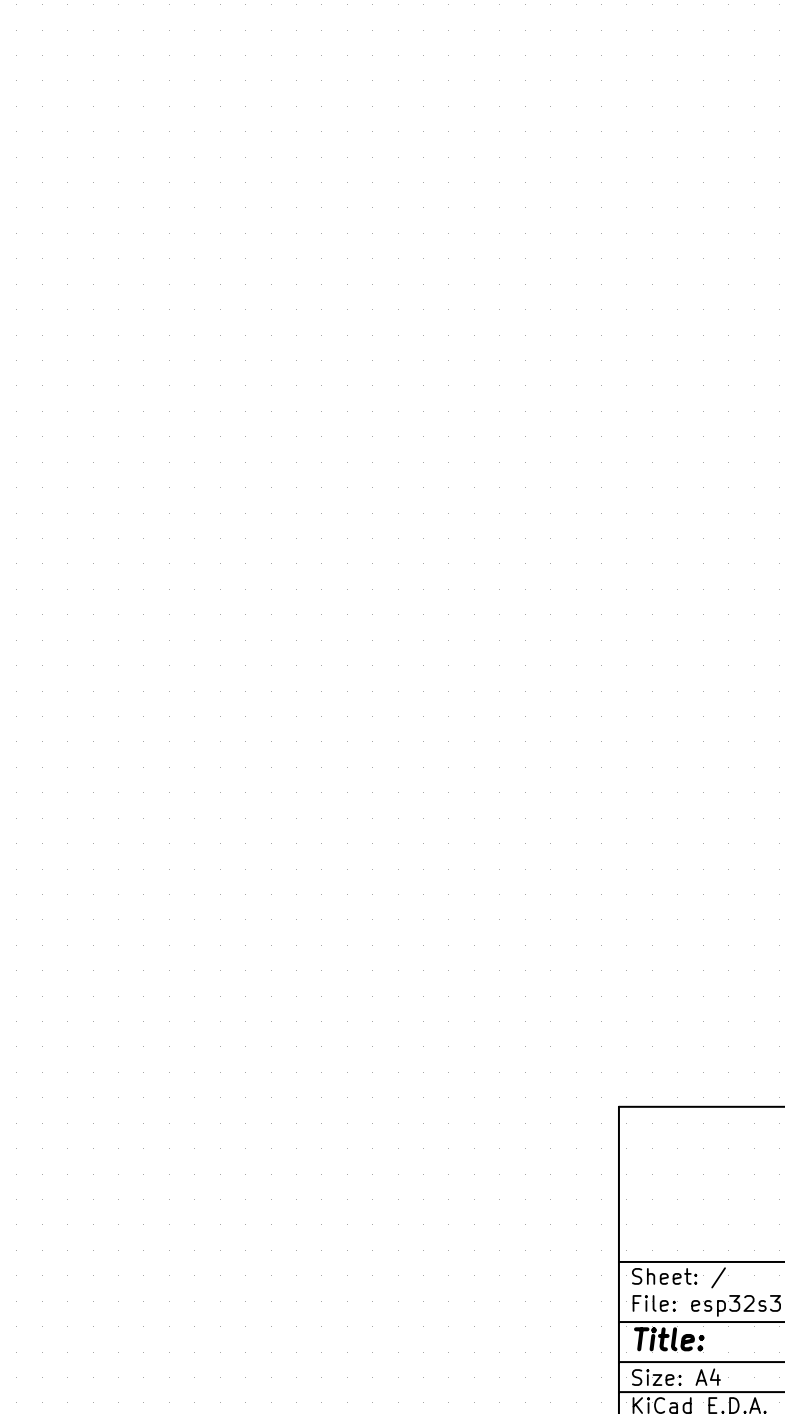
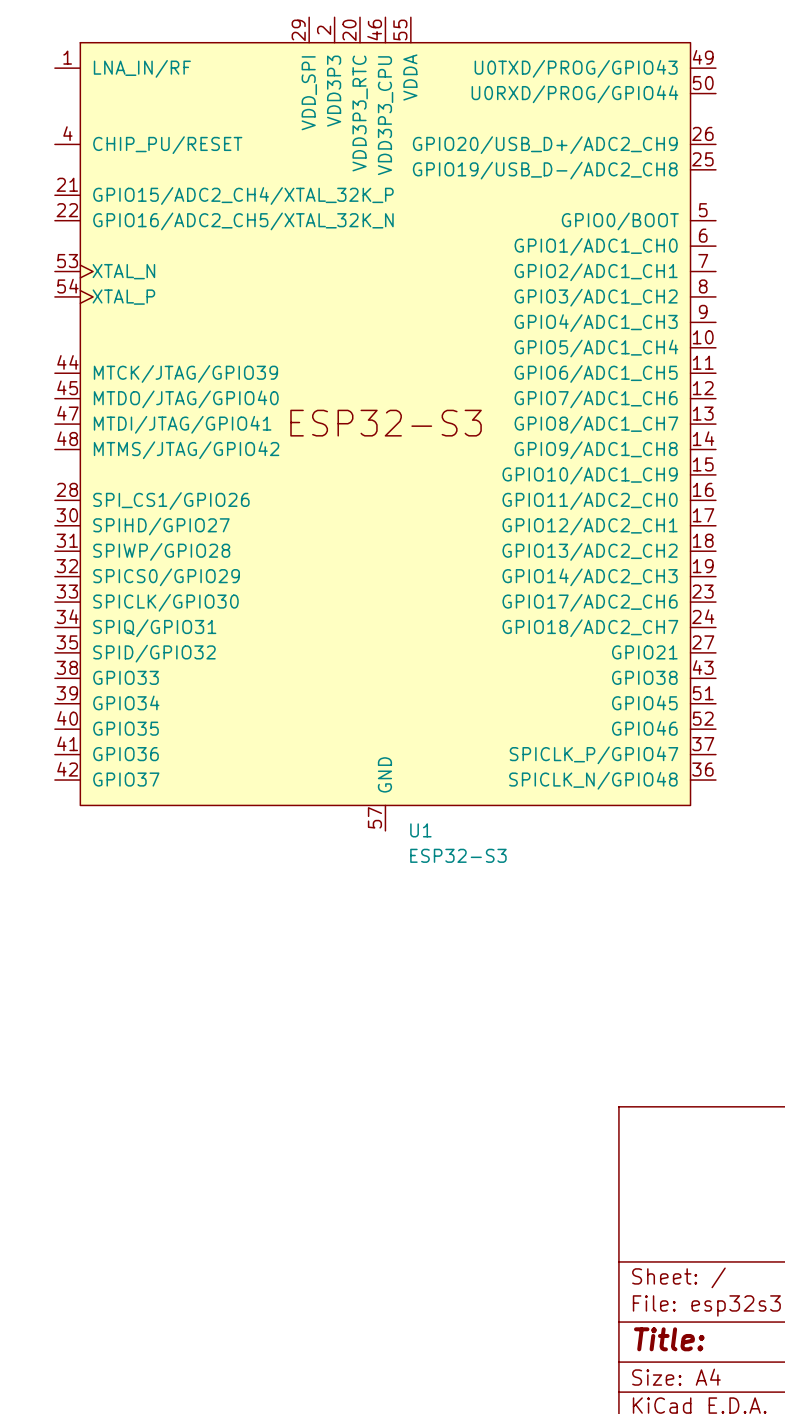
U1: none -> ESP32-S3 (385, 424)

